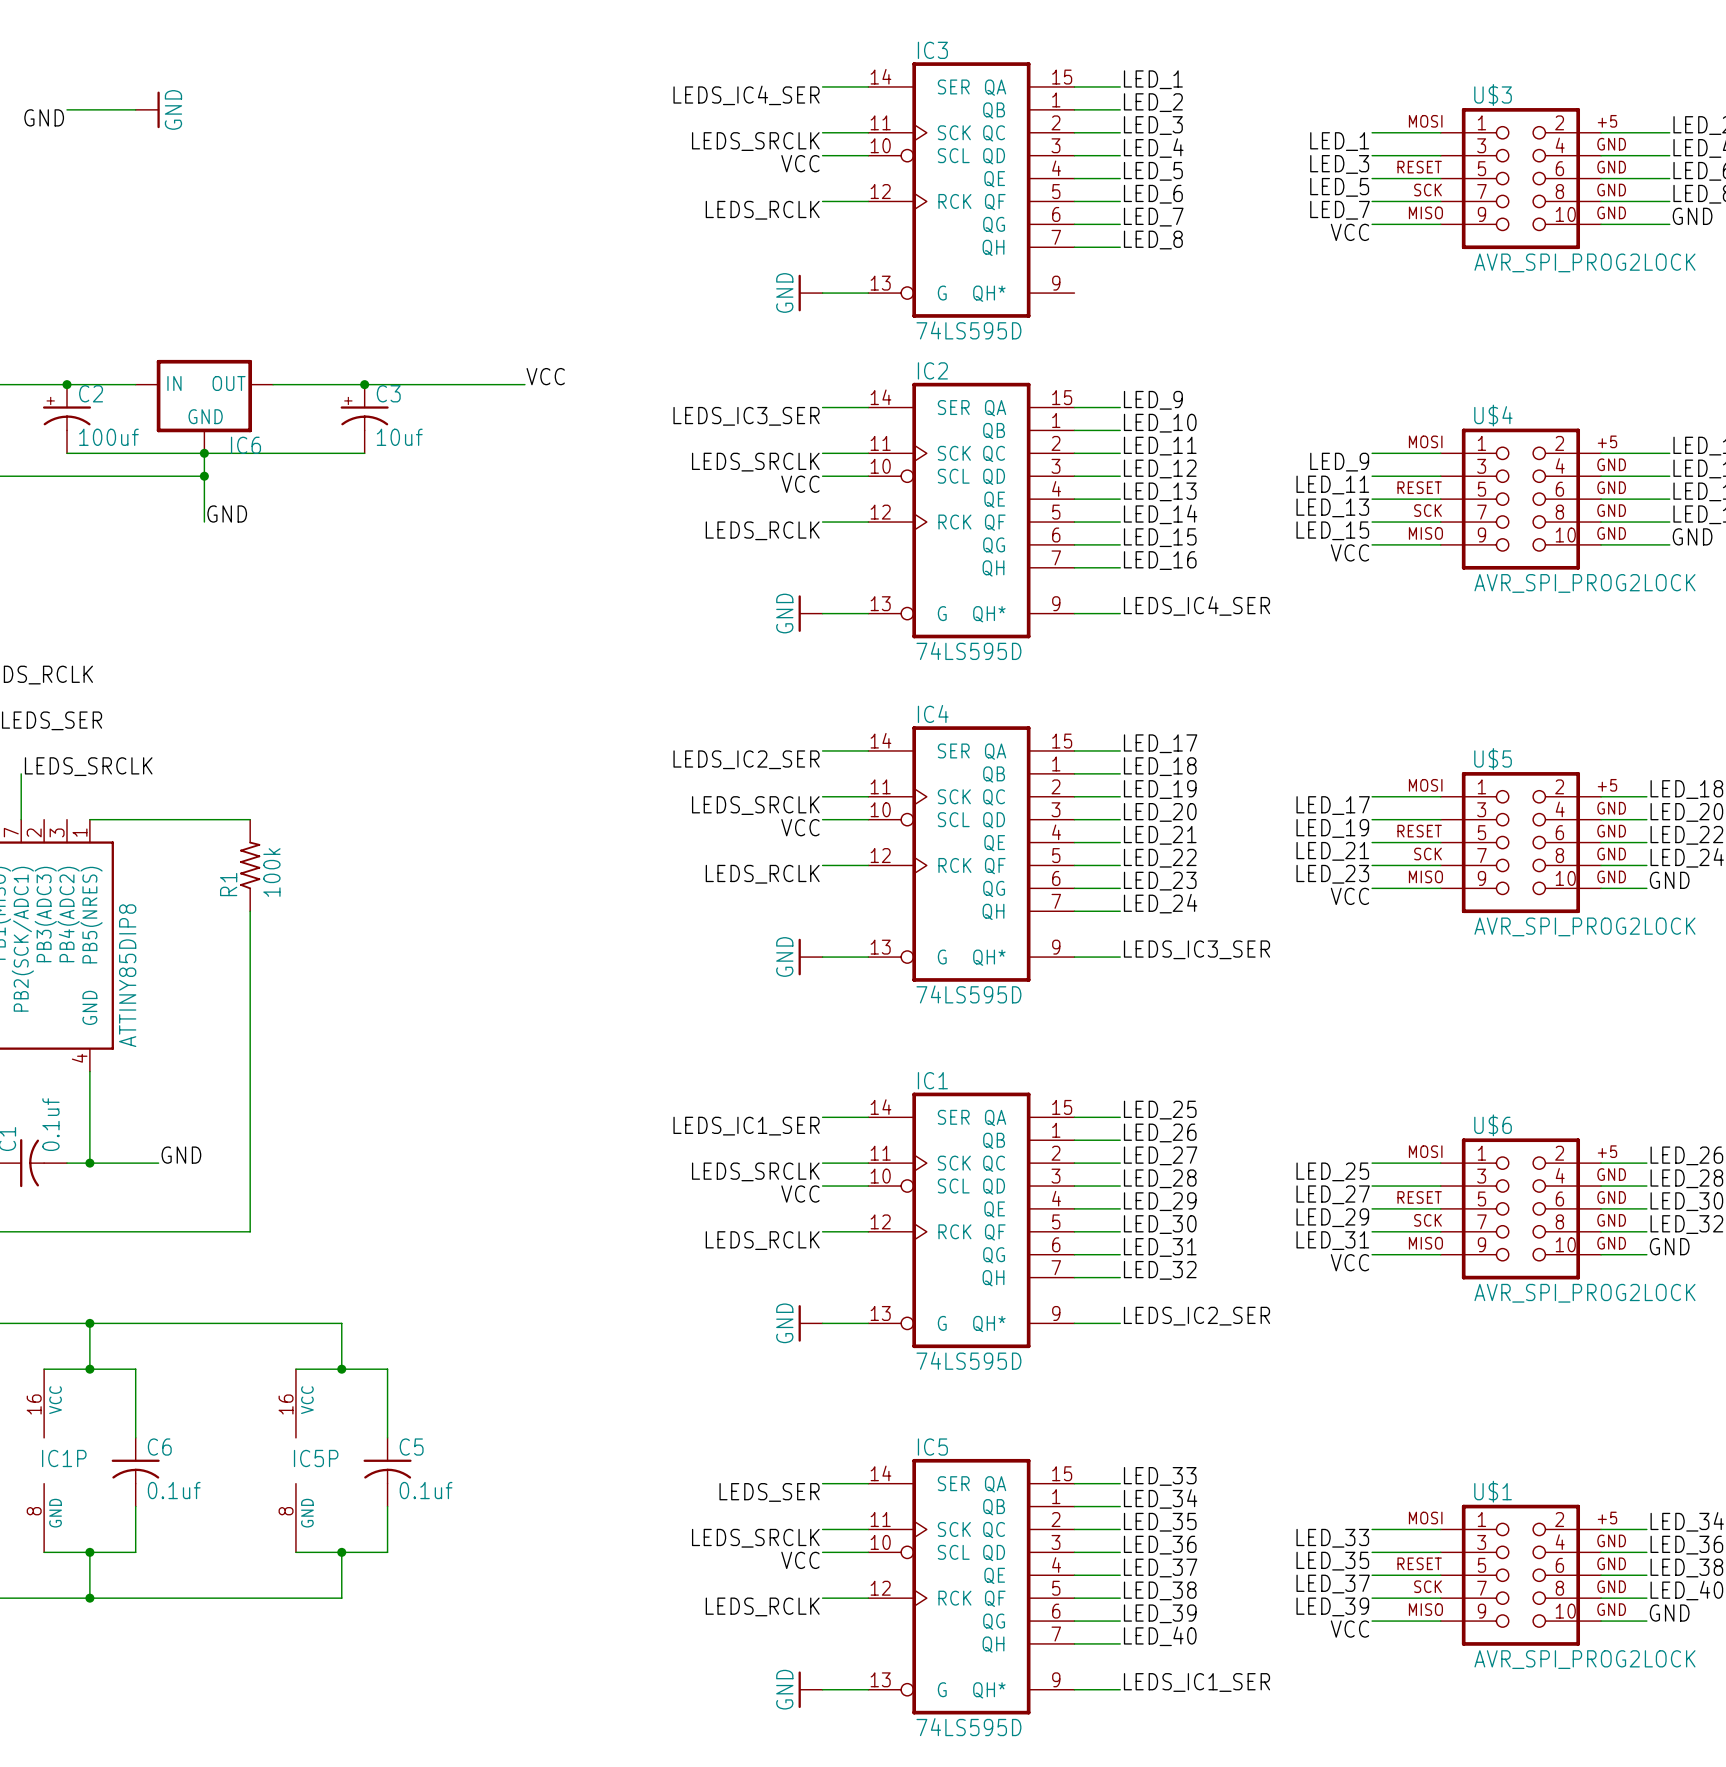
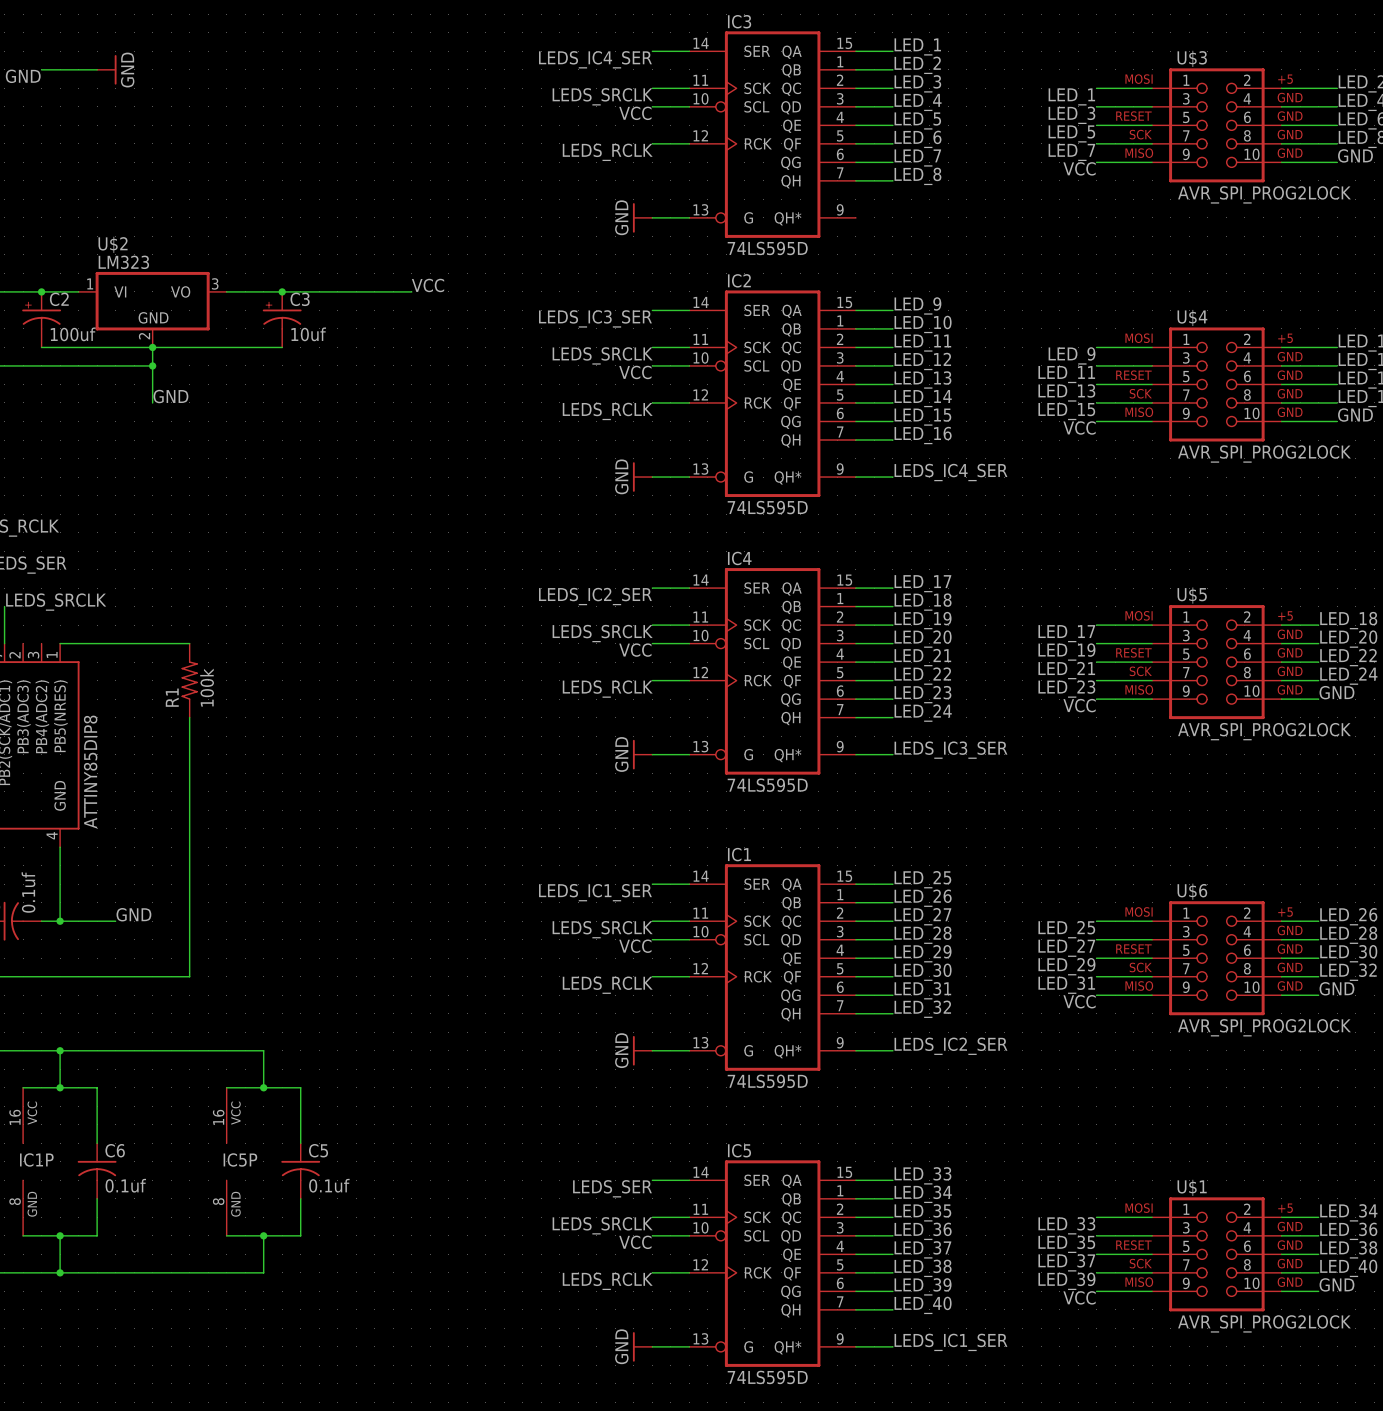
IC6: (204, 406) -> none
U$2: none -> LM323 (152, 309)

